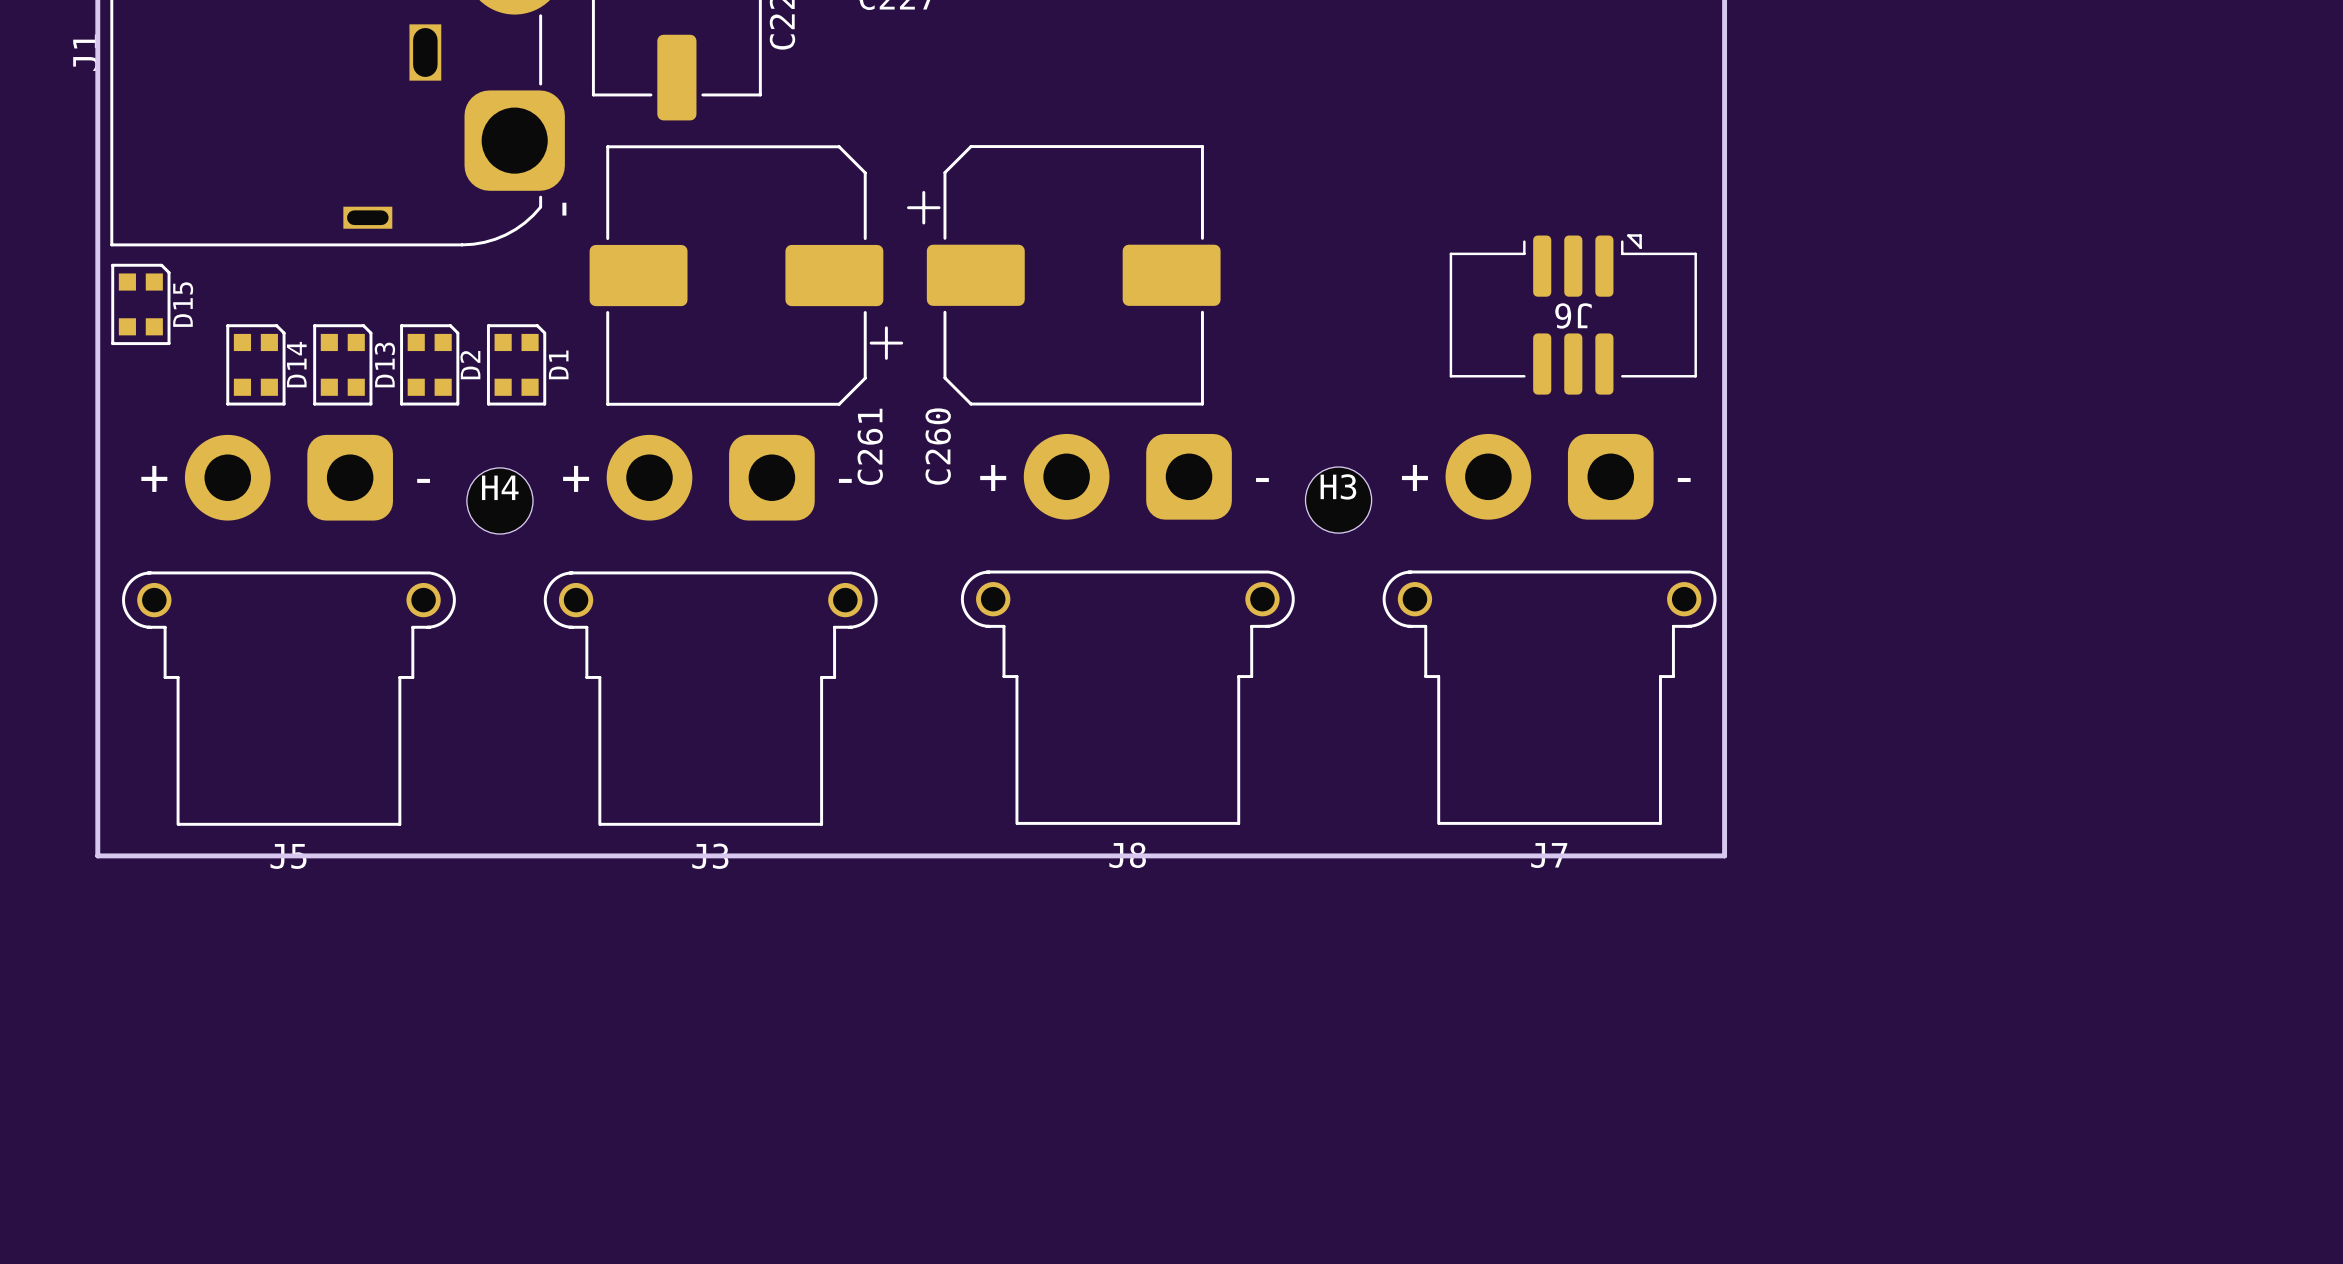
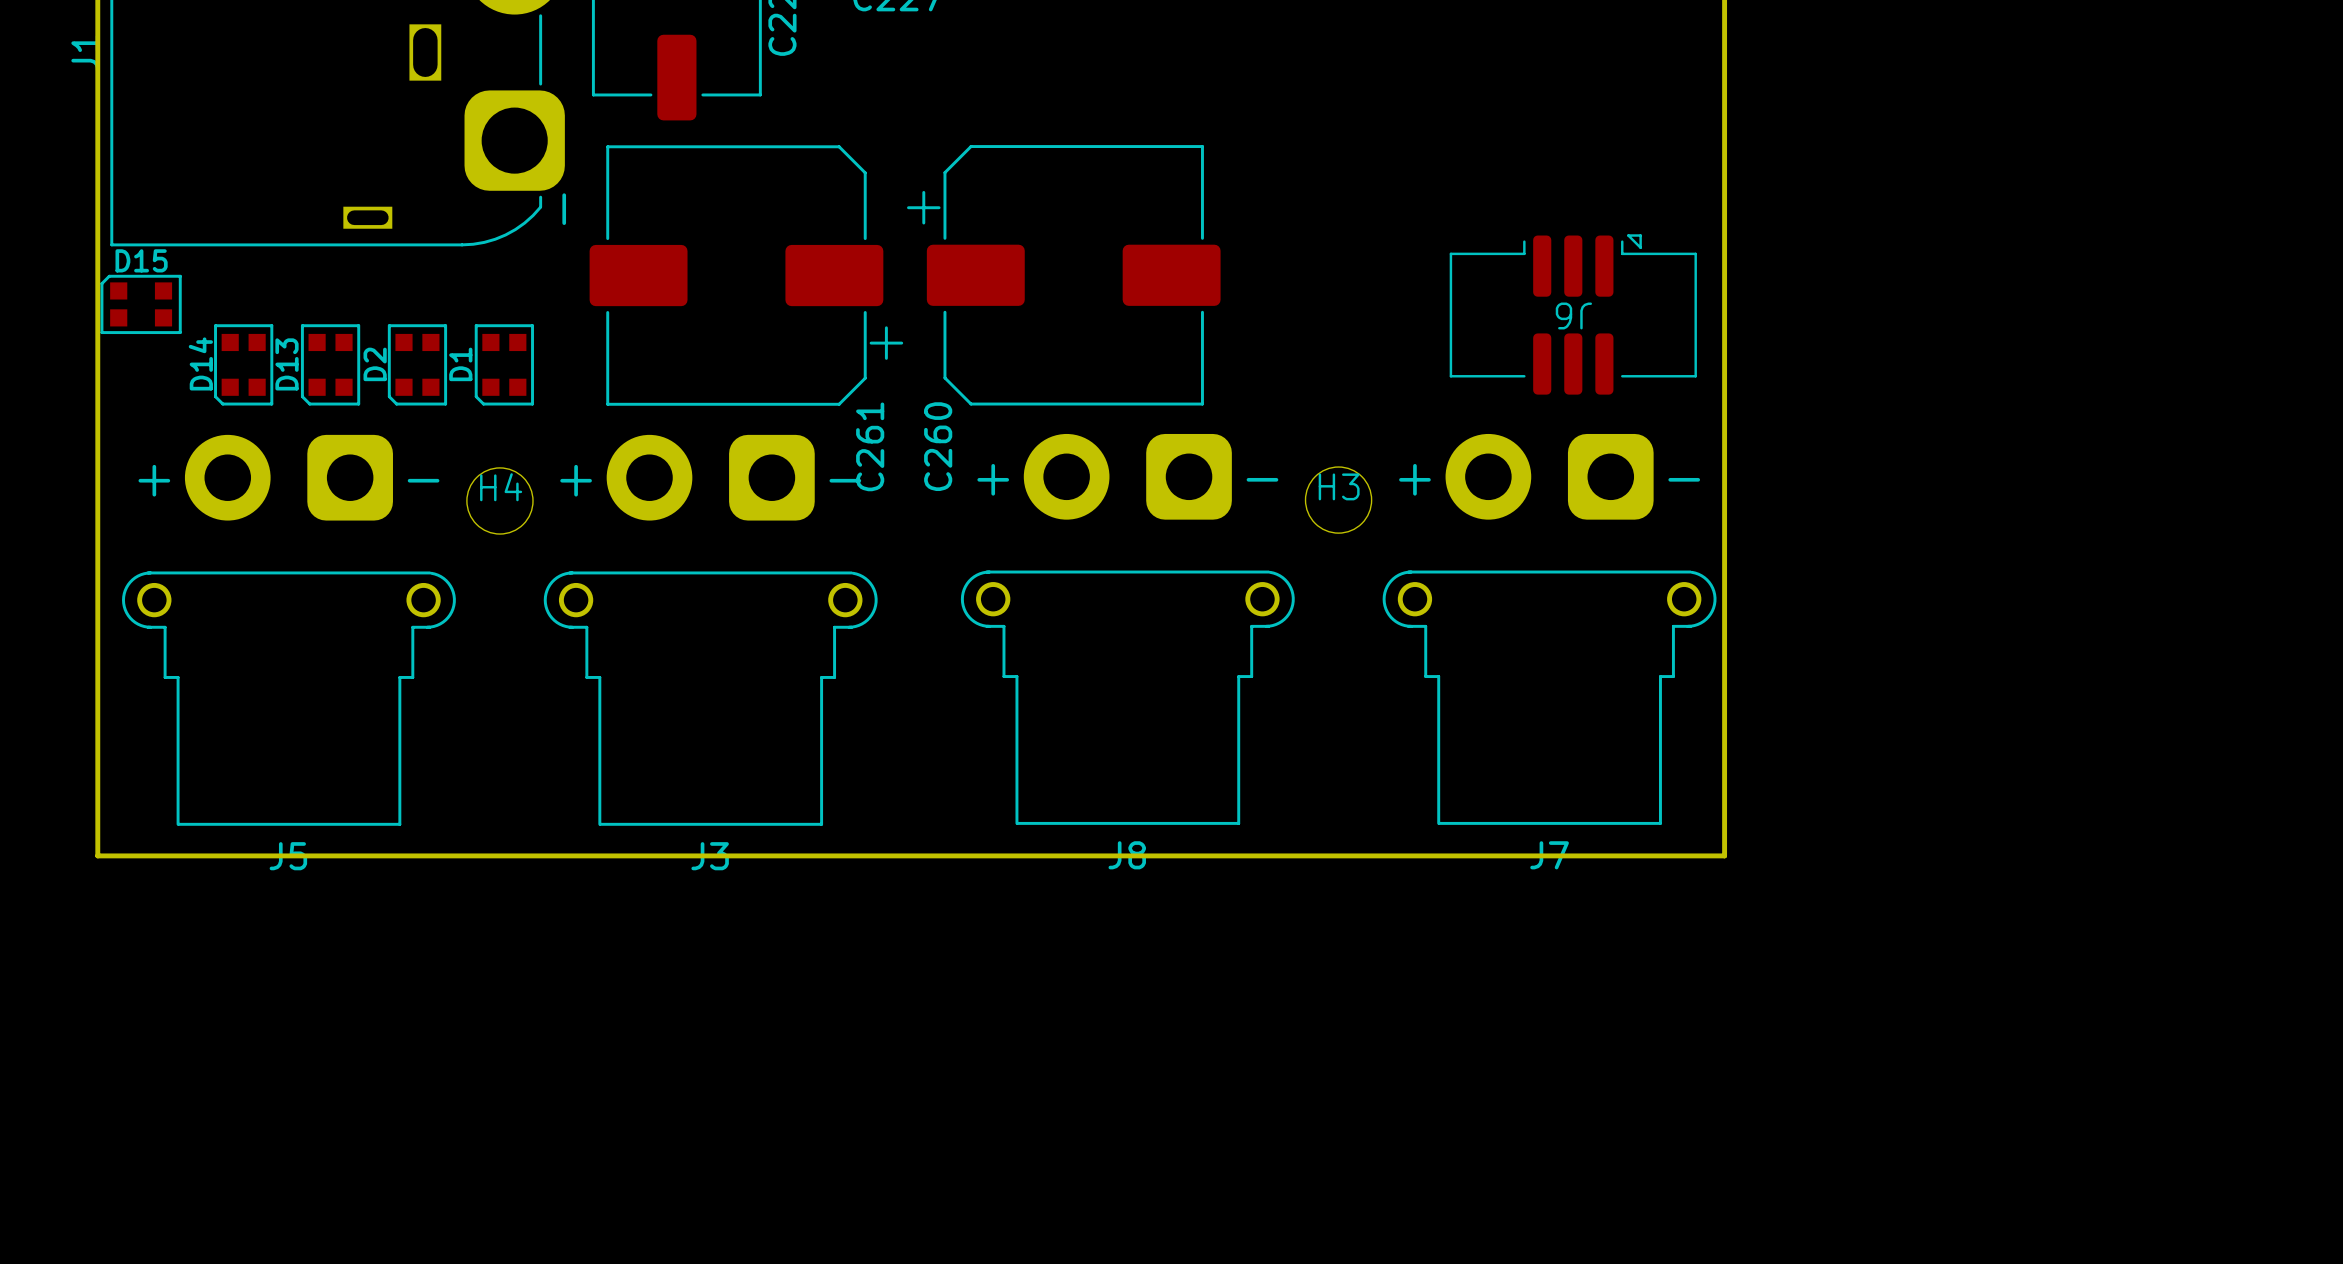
D15 rotation: 0° (140, 304) -> 90° counterclockwise (141, 304)
D14 rotation: 0° (255, 364) -> 180° (243, 364)
D13 rotation: 0° (342, 364) -> 180° (330, 364)
D2 rotation: 0° (429, 364) -> 180° (417, 364)
D1 rotation: 0° (516, 364) -> 180° (504, 364)

